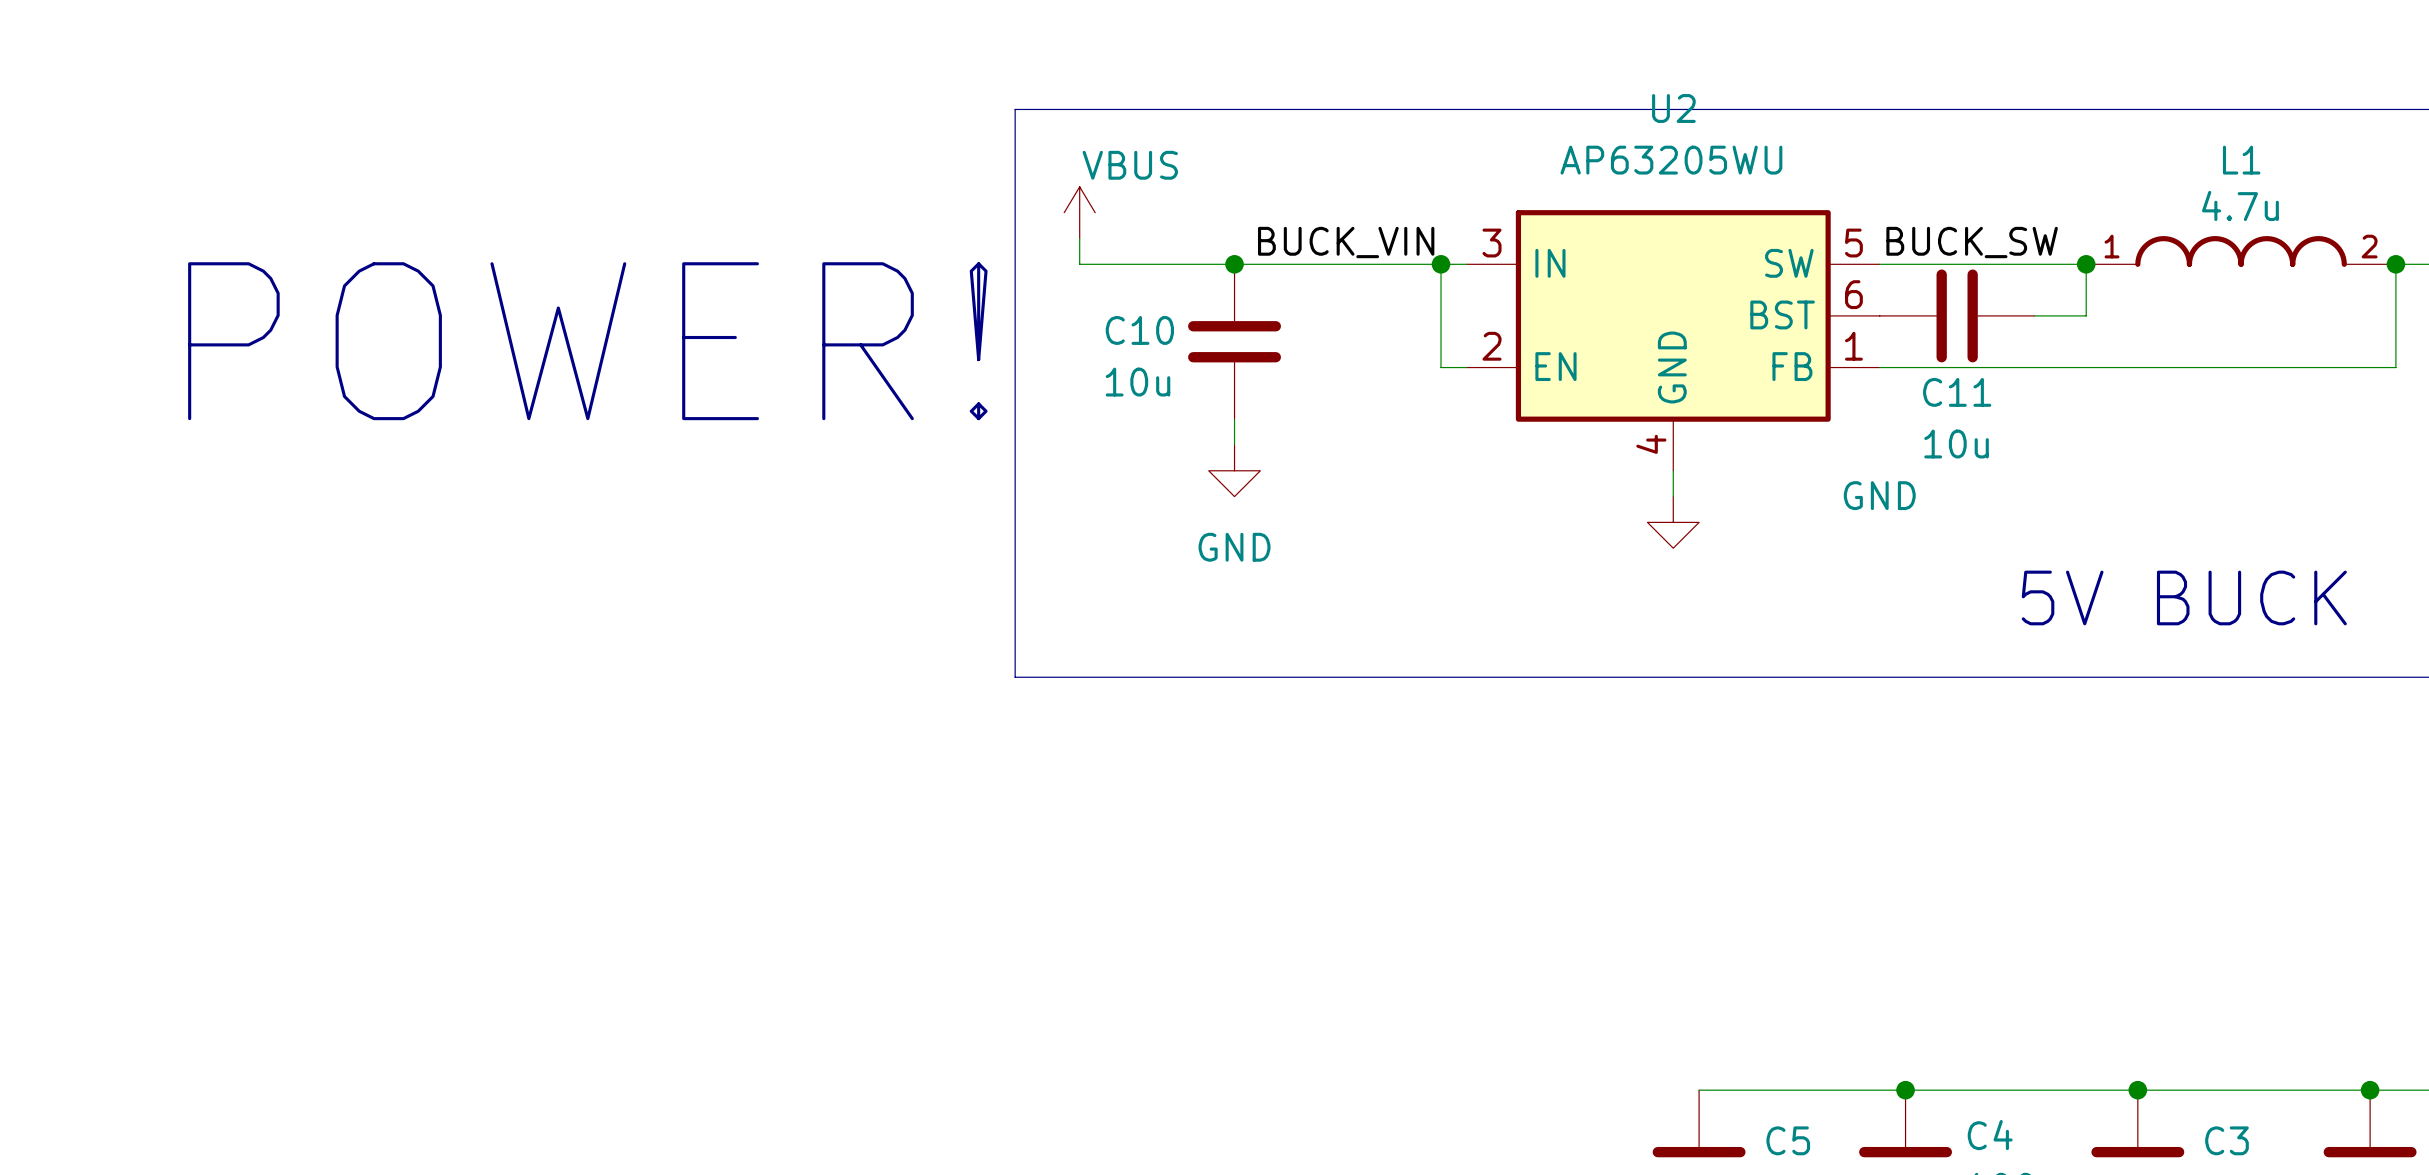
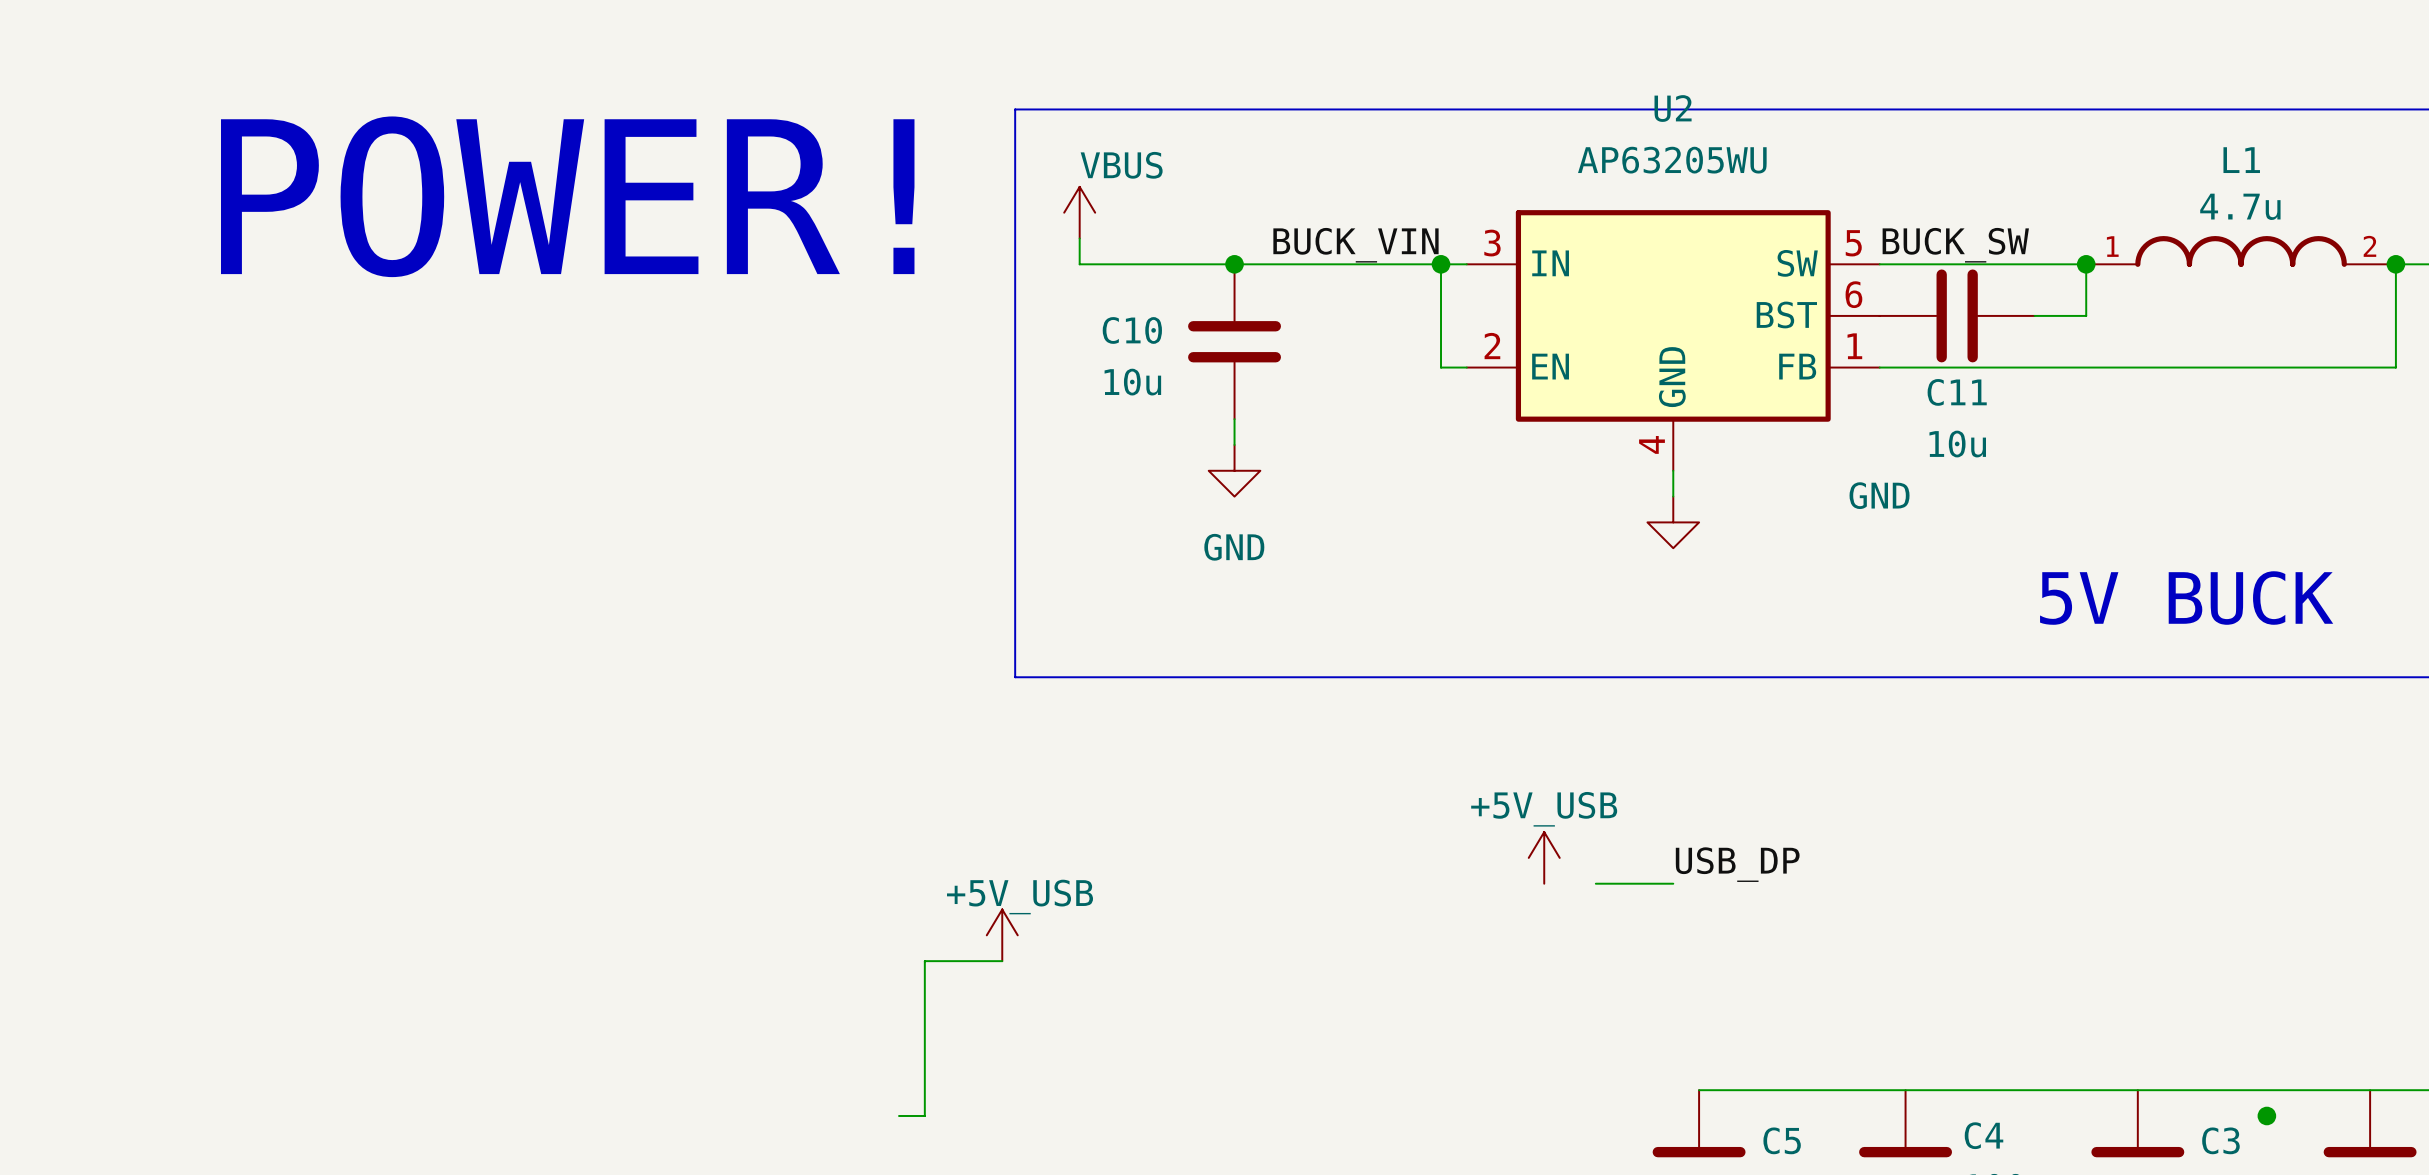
text position: POWER! (587, 341) -> POWER! (567, 196)
power symbol: none -> +5V_USB (1544, 857)
label: none -> USB_DP (1737, 864)
wire: none -> (1595, 883) (1673, 883)
power symbol: none -> +5V_USB (1002, 935)
wire: none -> (1002, 961) (924, 961) (924, 1115) (899, 1115)
junction: (1905, 1090) -> none
junction: (2137, 1090) -> none
junction: (2370, 1090) -> none
junction: none -> (2266, 1115)

